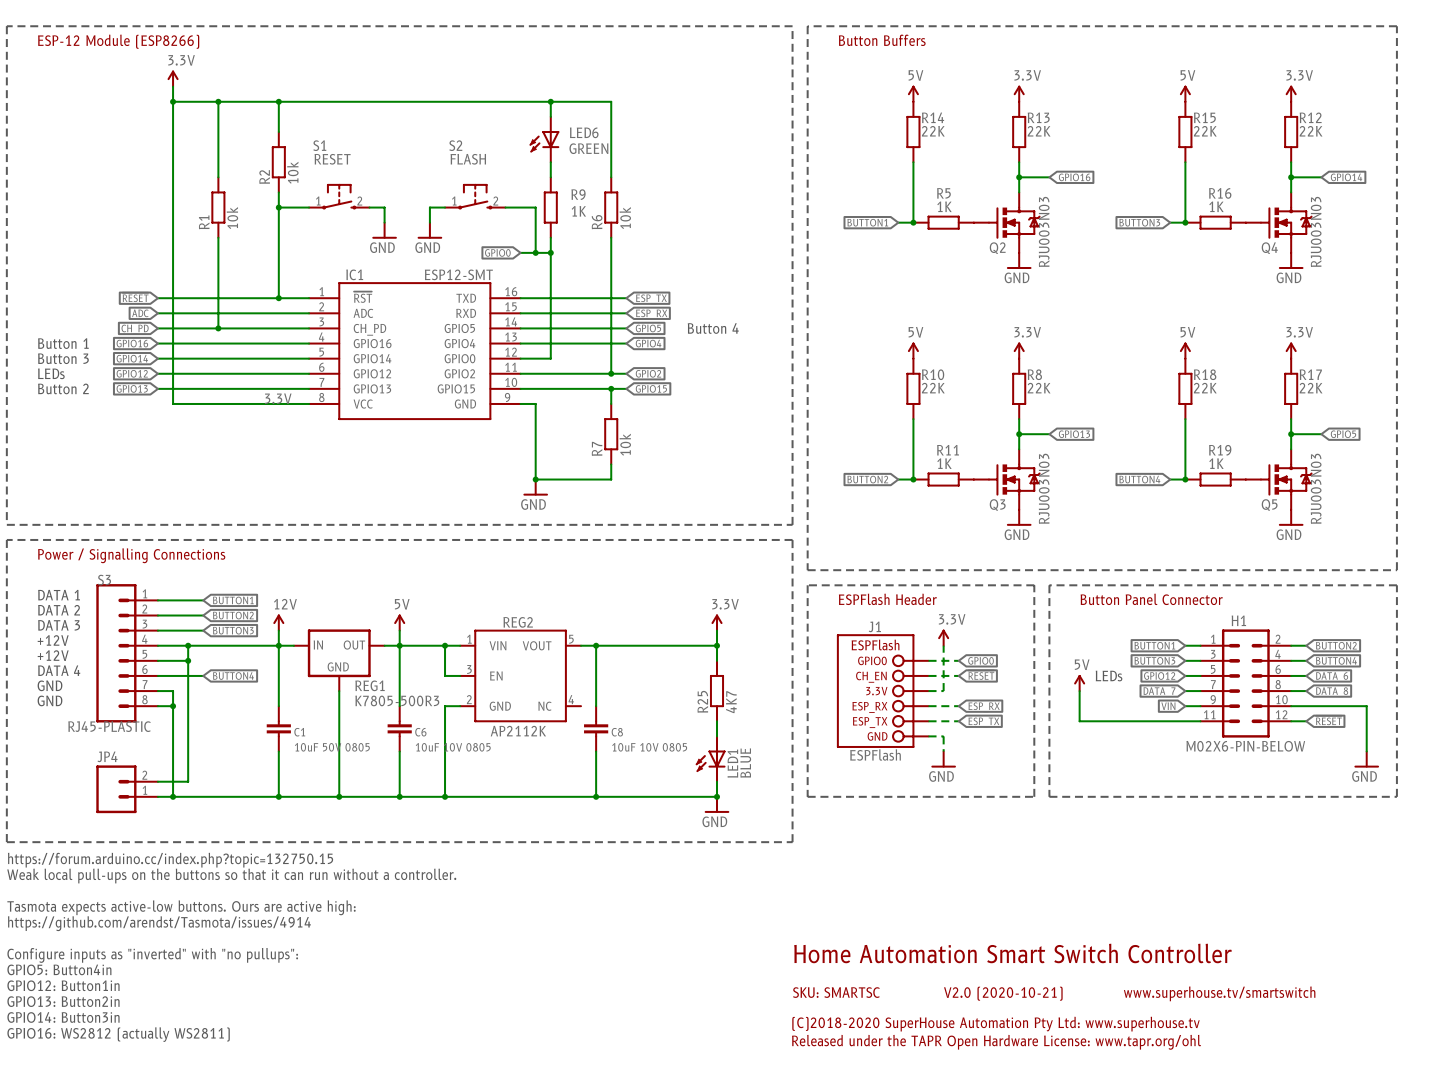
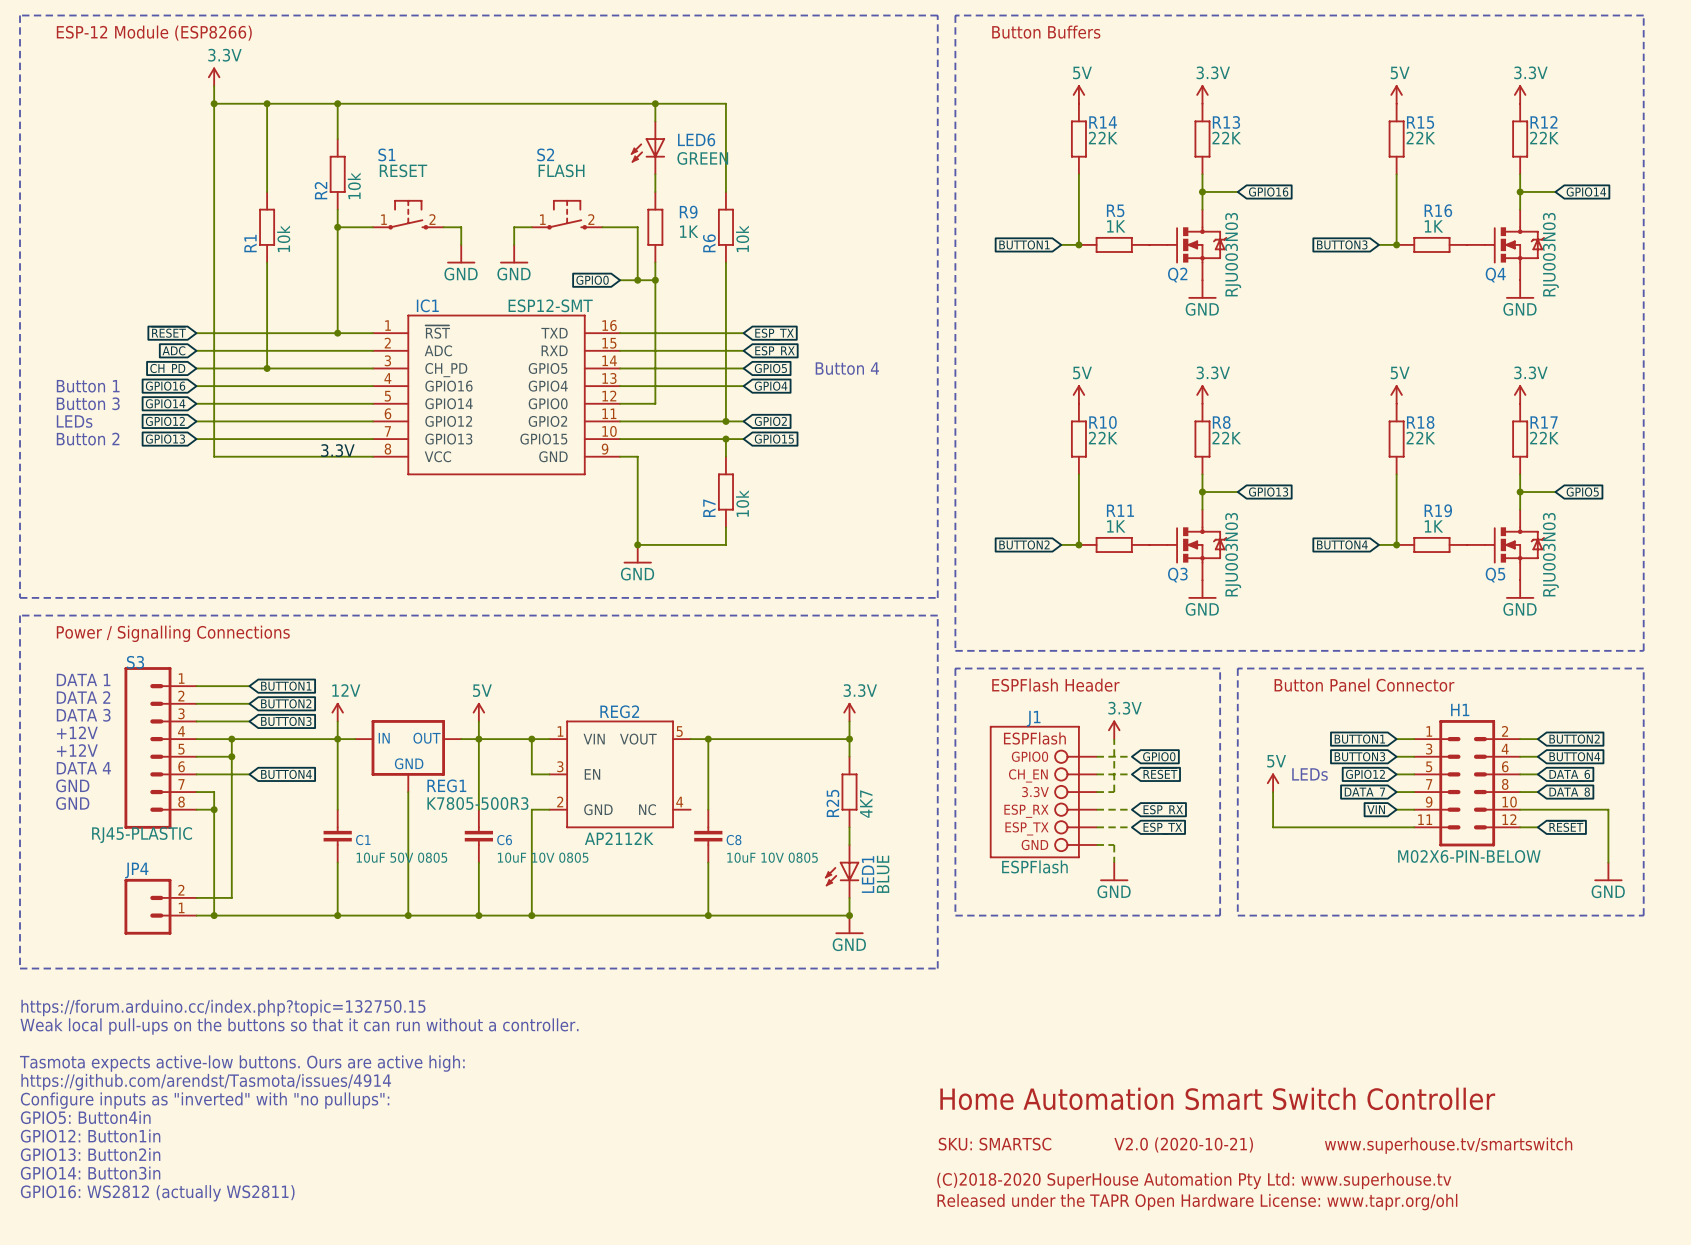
text: https://forum.arduino.cc/index.php?topic=132750.15 (170, 860) -> none
text: Weak local pull-ups on the buttons so that it can run without a controller. (231, 876) -> https://forum.arduino.cc/index.php?topic=132750.15 (223, 1007)
text: none -> Weak local pull-ups on the buttons so that it can run without a controller. (299, 1026)
text: Tasmota expects active-low buttons. Ours are active high: (181, 907) -> none
text: https://github.com/arendst/Tasmota/issues/4914 (159, 923) -> Tasmota expects active-low buttons. Ours are active high: (242, 1063)
text: none -> https://github.com/arendst/Tasmota/issues/4914 (206, 1082)

